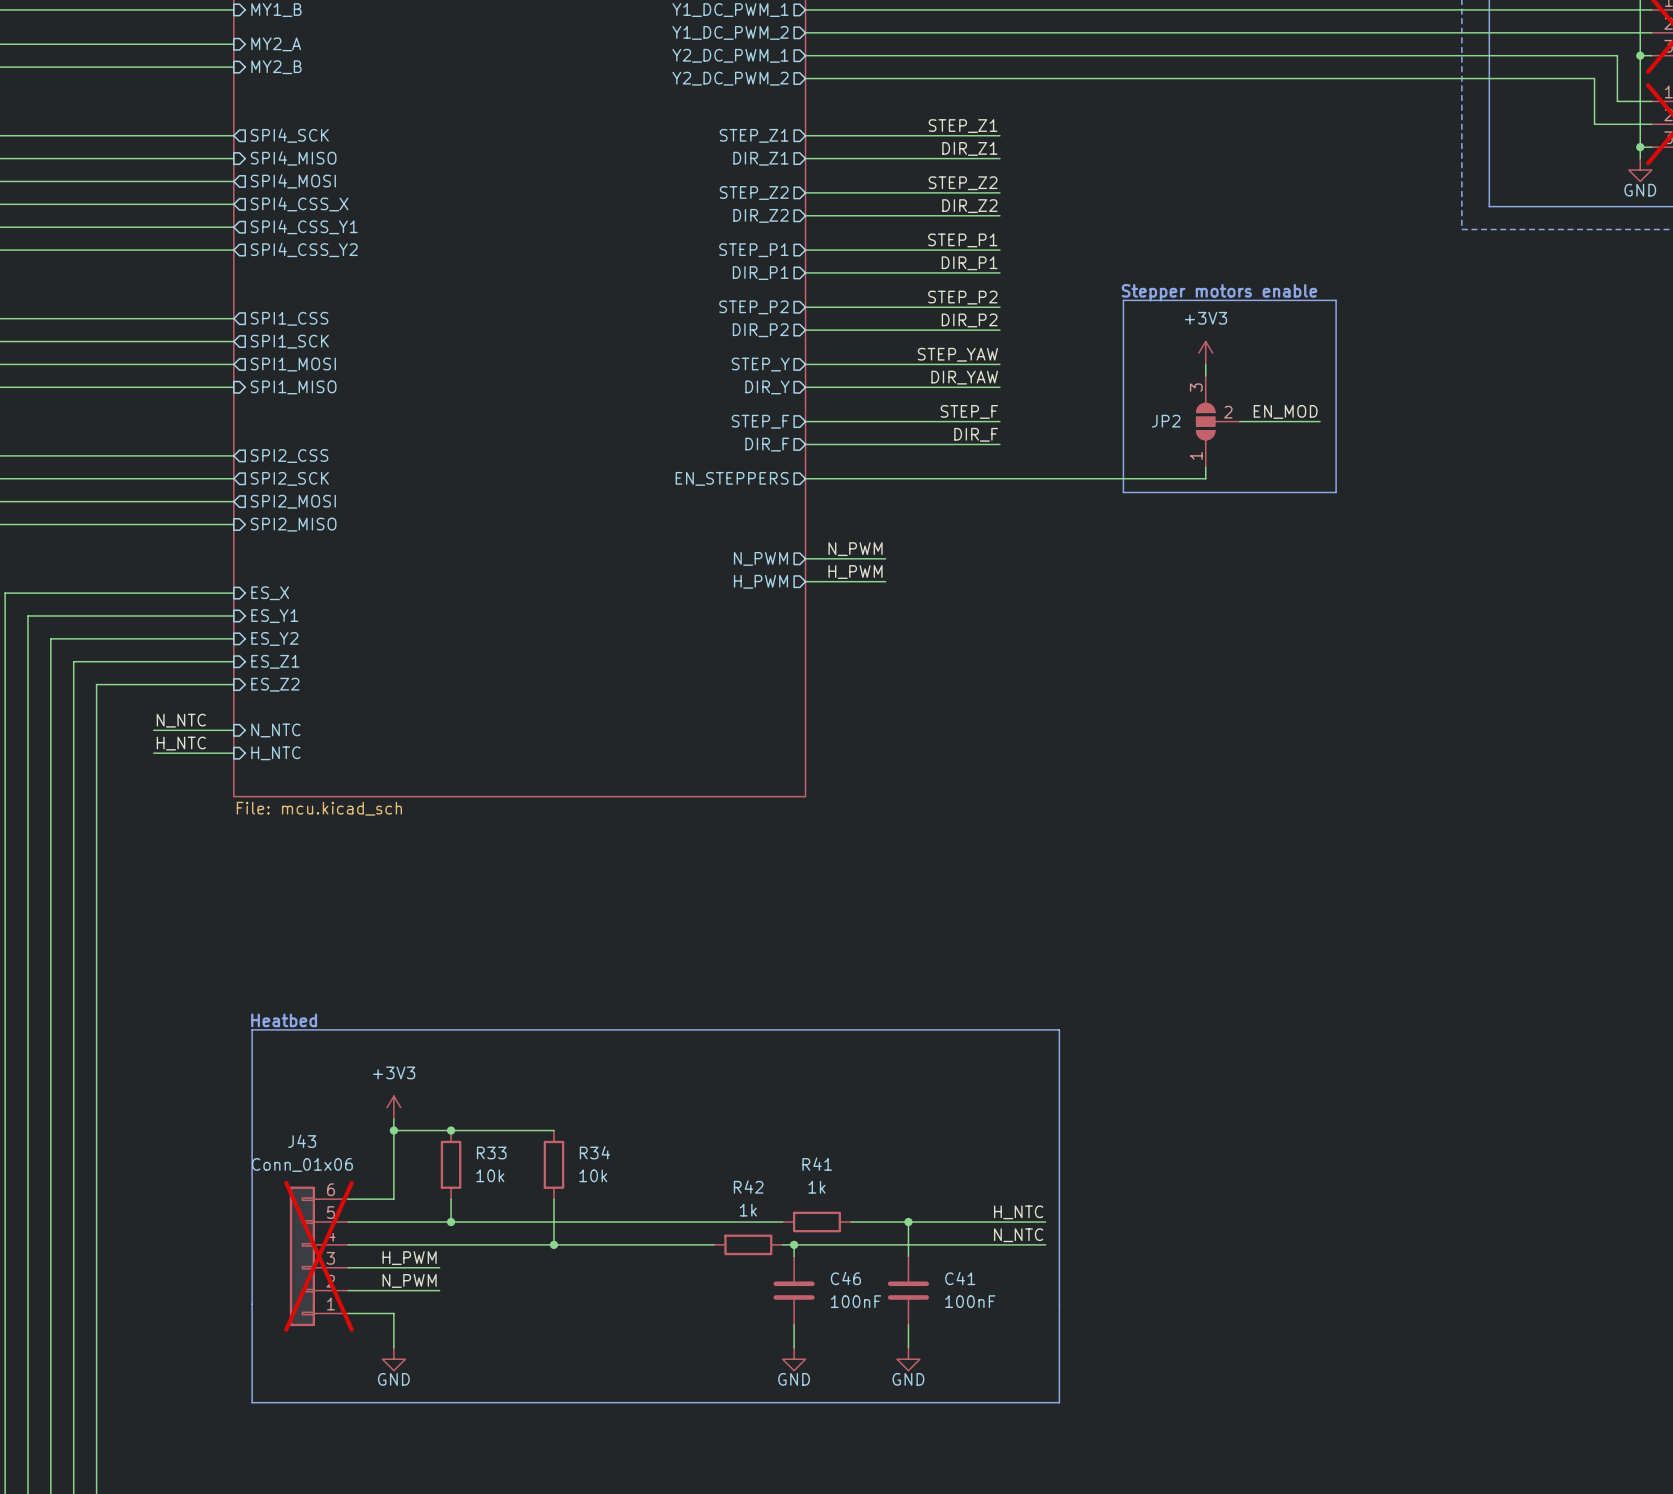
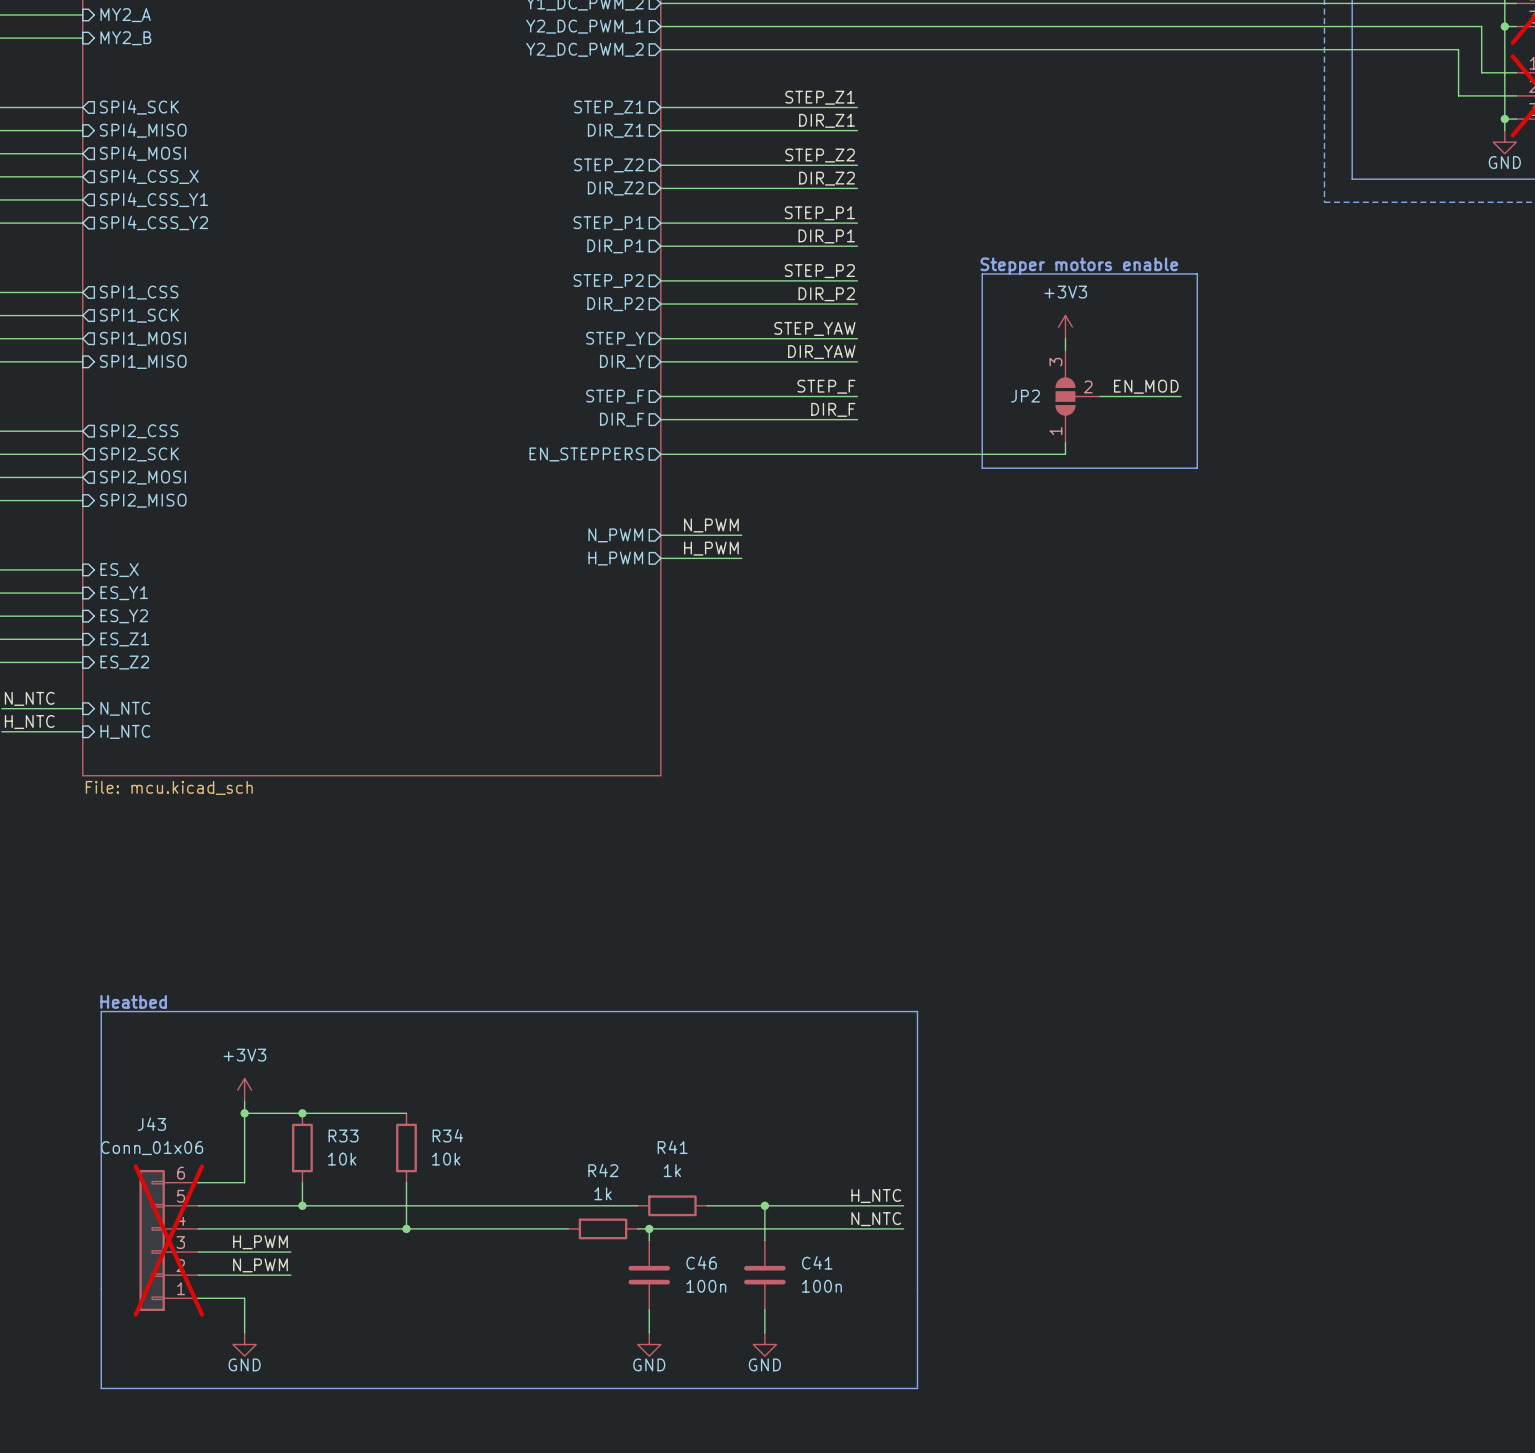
C46 value: 100nF (855, 1301) -> 100n (706, 1286)
C41 value: 100nF (970, 1301) -> 100n (821, 1286)

